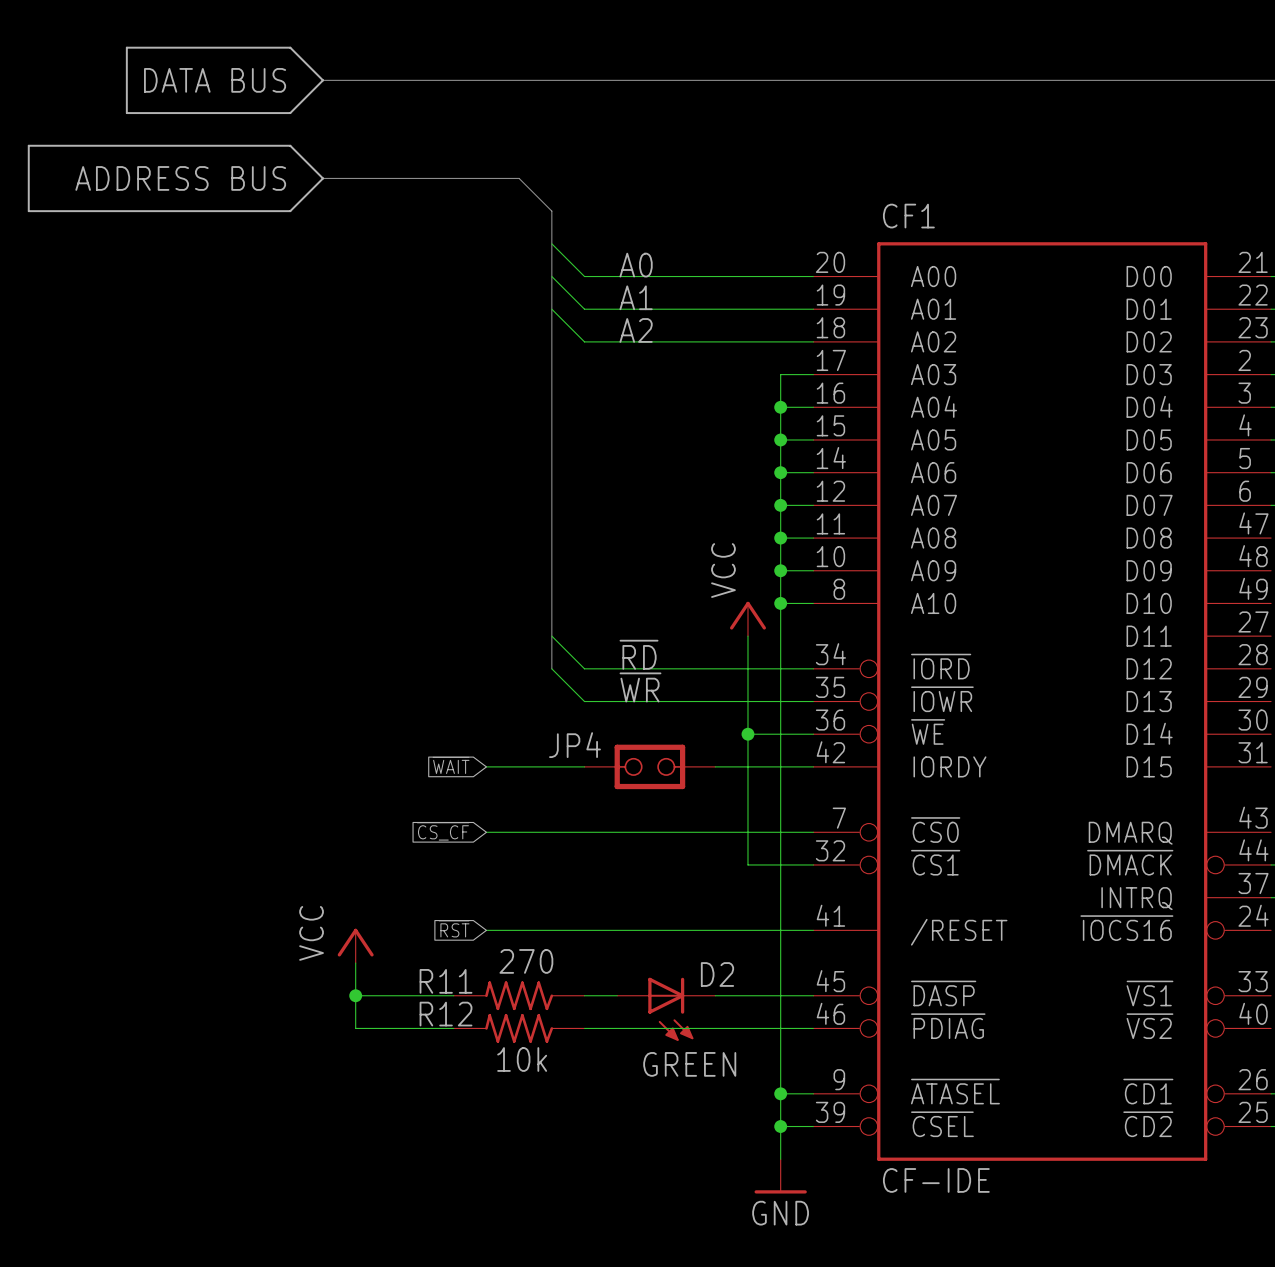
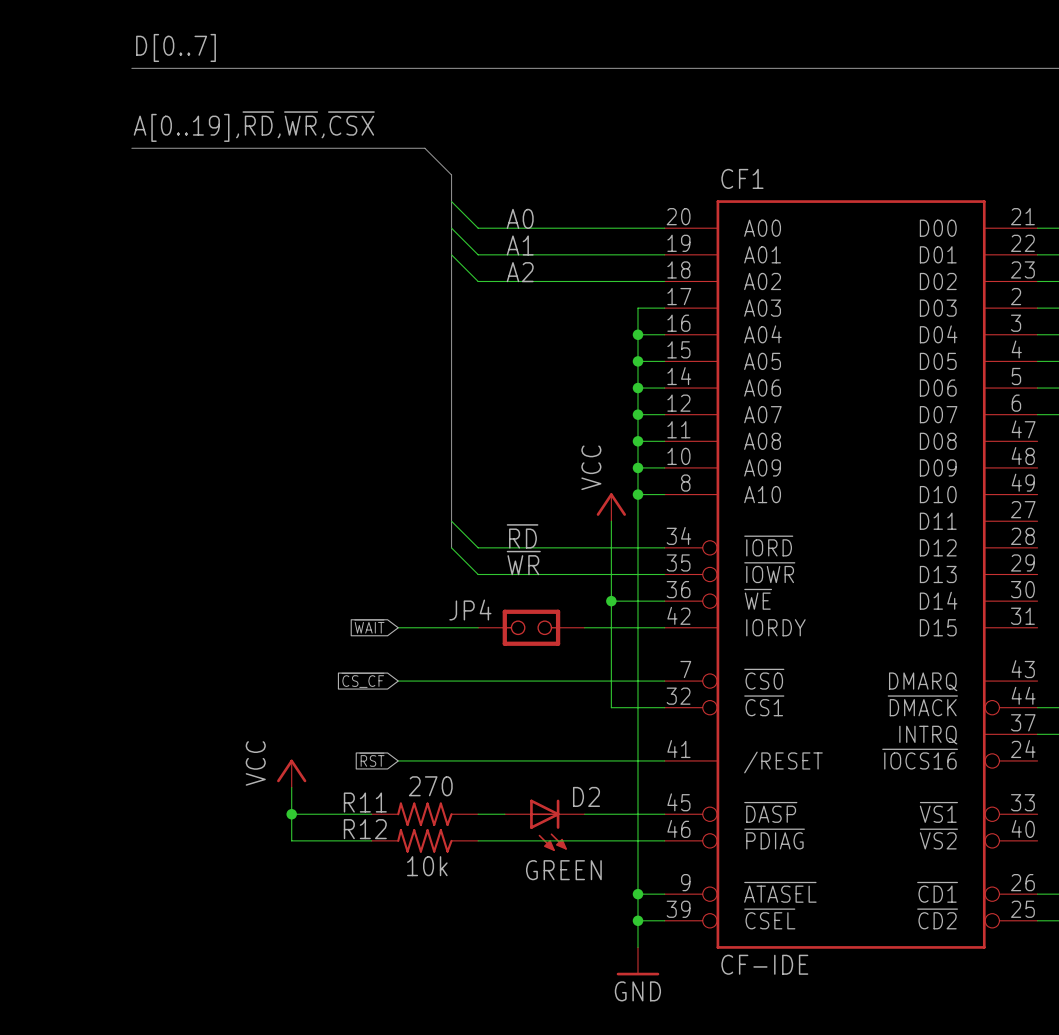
line: (126, 47) (126, 113) (290, 113) (322, 80) (290, 47) (126, 47) -> none
label: none -> D[0..7] (176, 47)
bus: none -> (131, 68) (265, 68)
text: DATA BUS (215, 80) -> none
line: (28, 145) (28, 211) (290, 211) (322, 178) (290, 145) (28, 145) -> none
label: none -> A[0..19],~{RD},~{WR},~{CSX} (254, 126)
bus: none -> (131, 148) (265, 148)
text: ADDRESS BUS (180, 178) -> none

